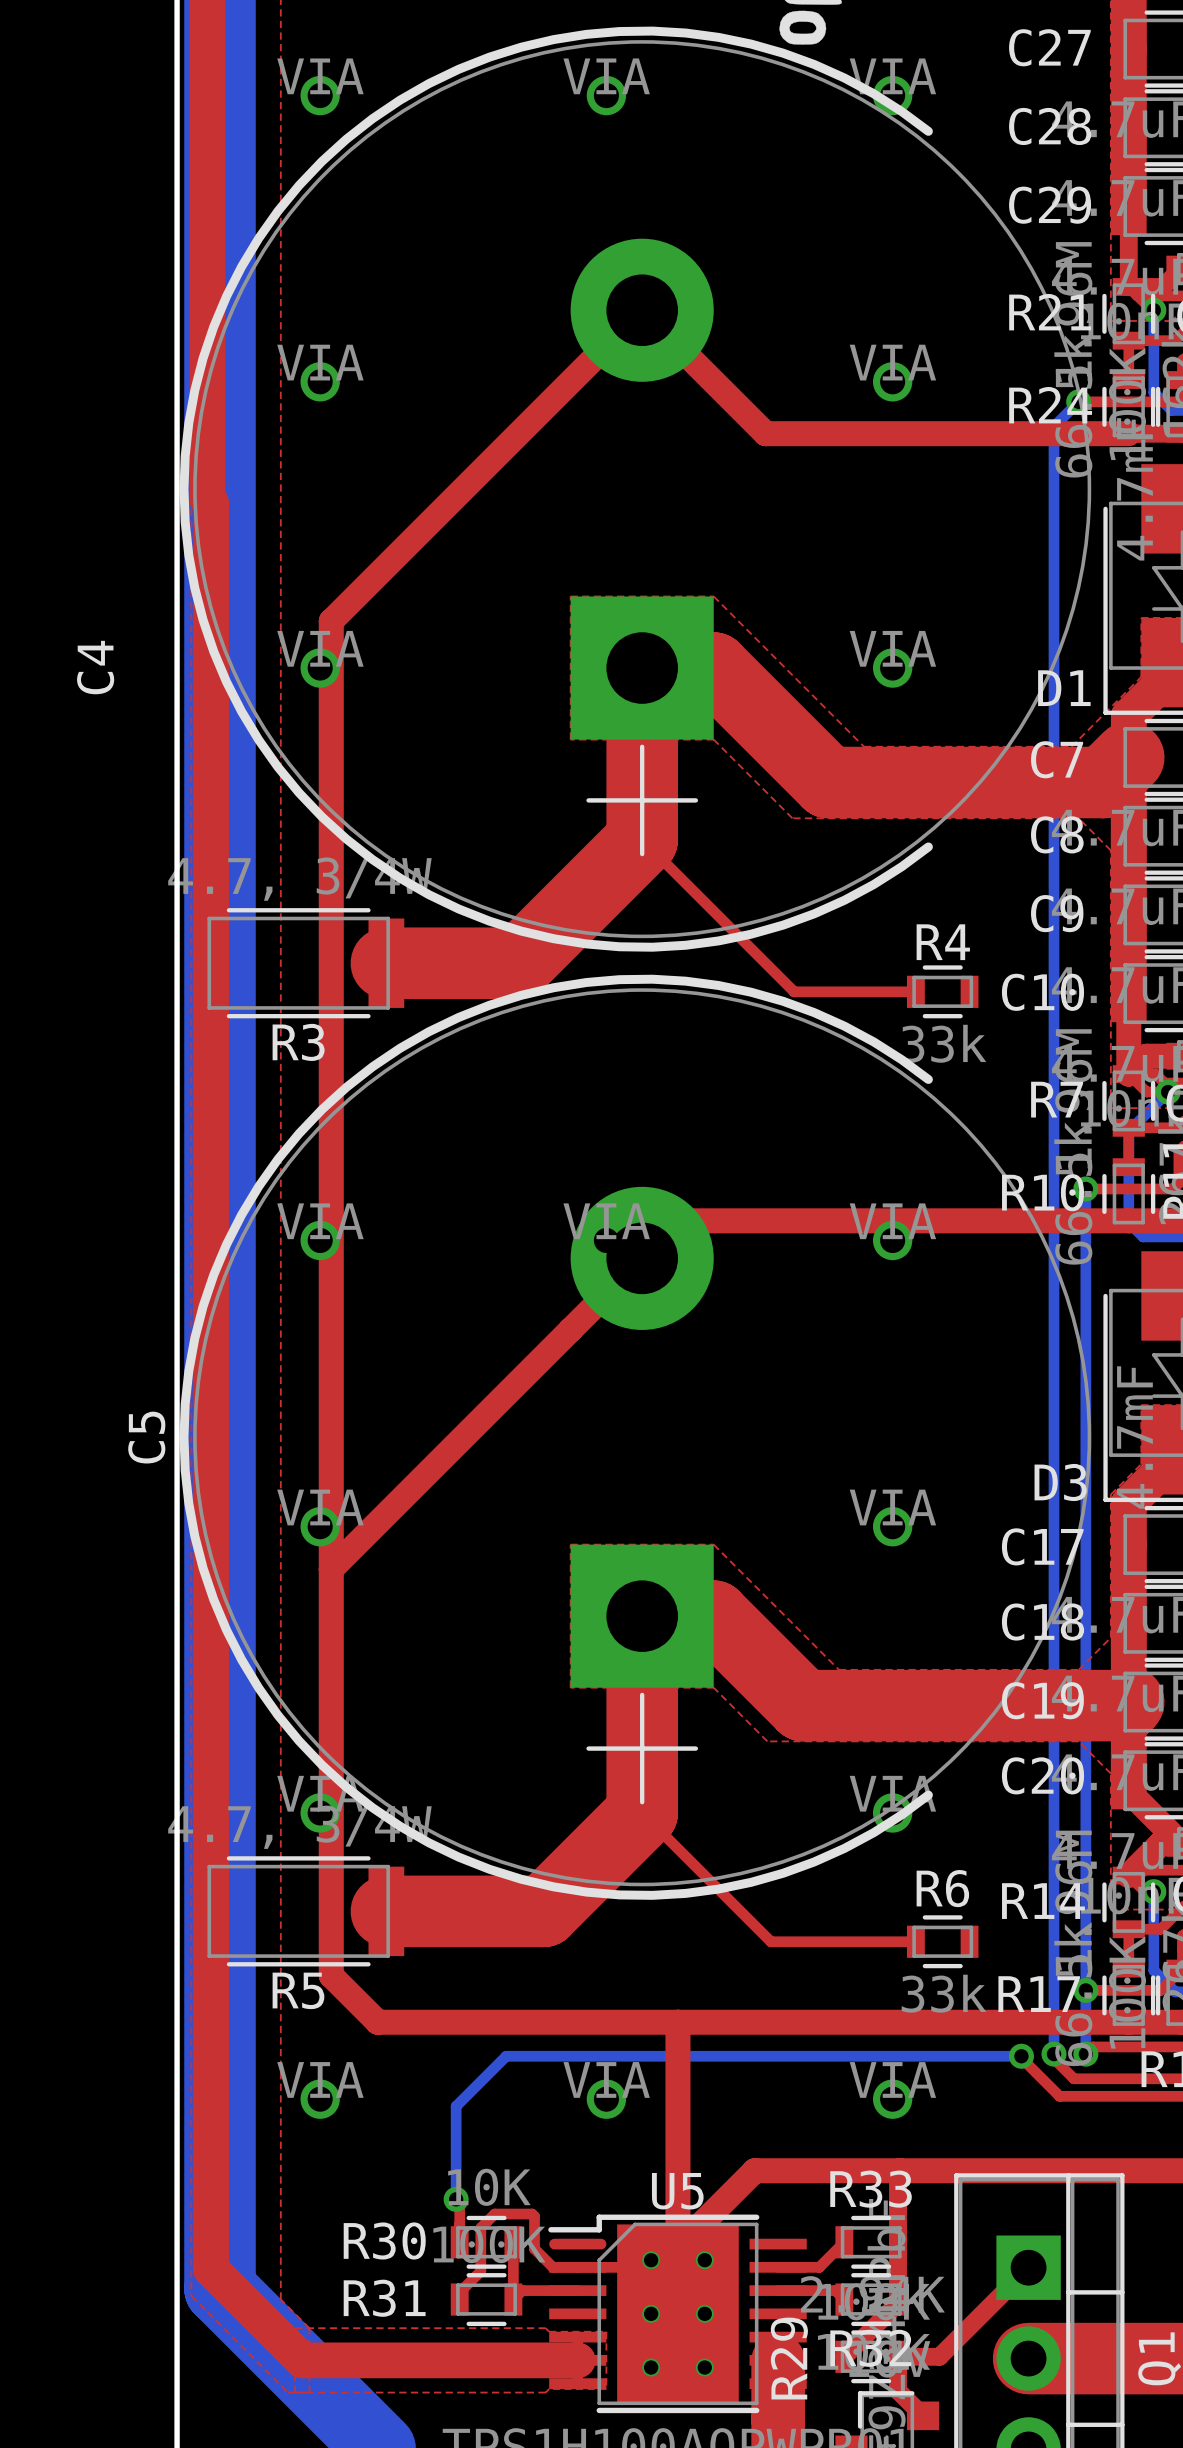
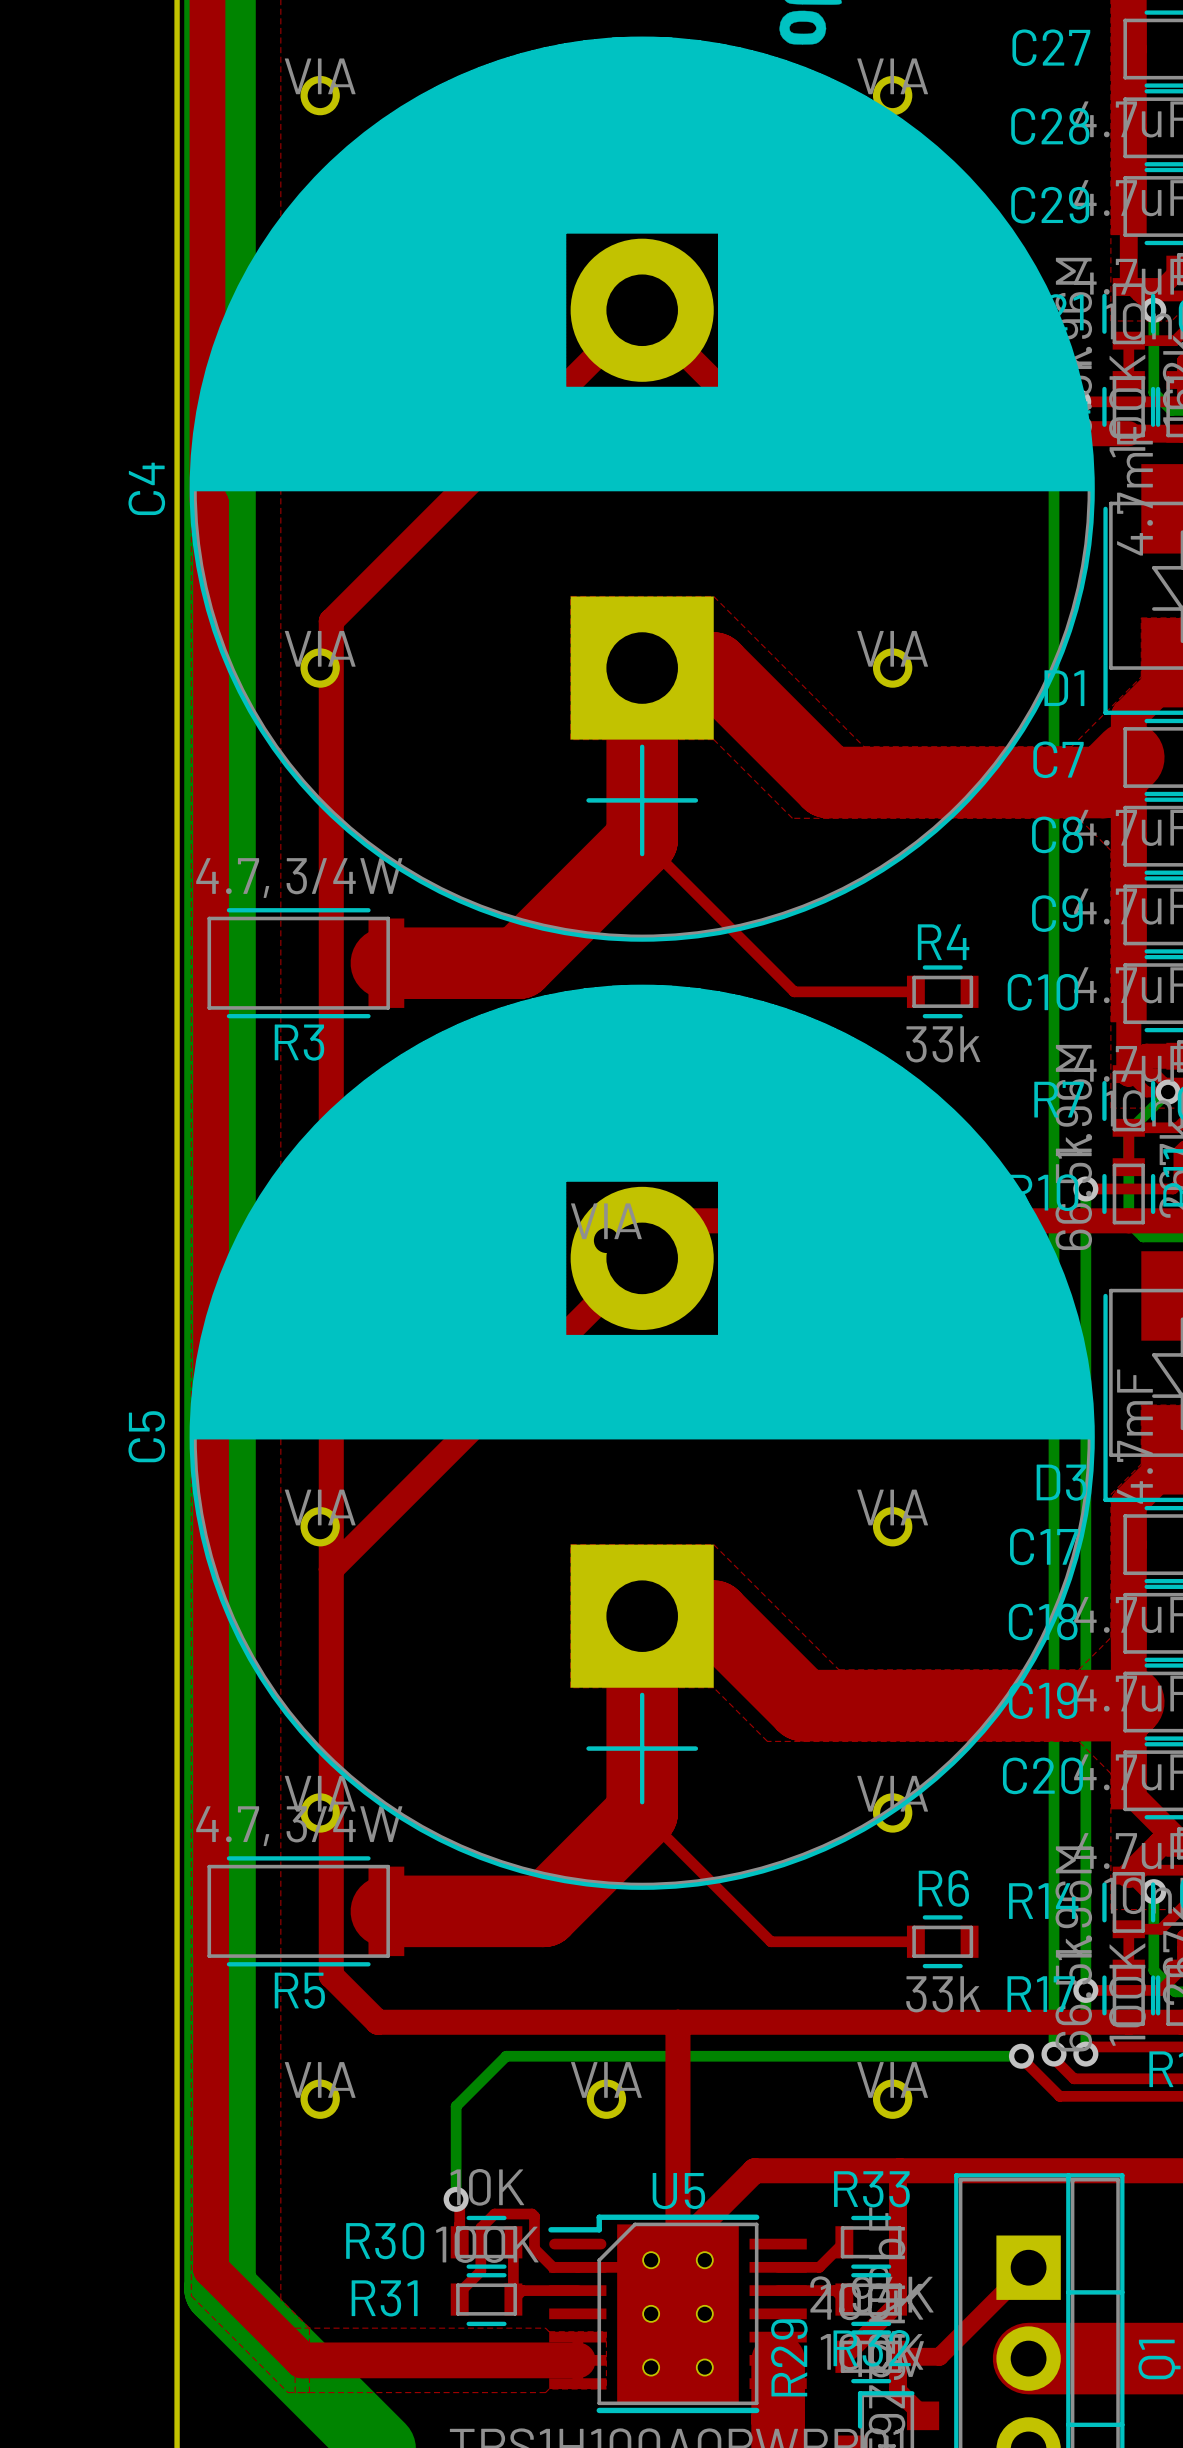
C4 footprint: [179, 26, 1092, 952] -> [189, 36, 1095, 942]
C4 name position: C4 (95, 667) -> C4 (146, 488)
C5 footprint: [179, 974, 1092, 1900] -> [189, 984, 1095, 1890]

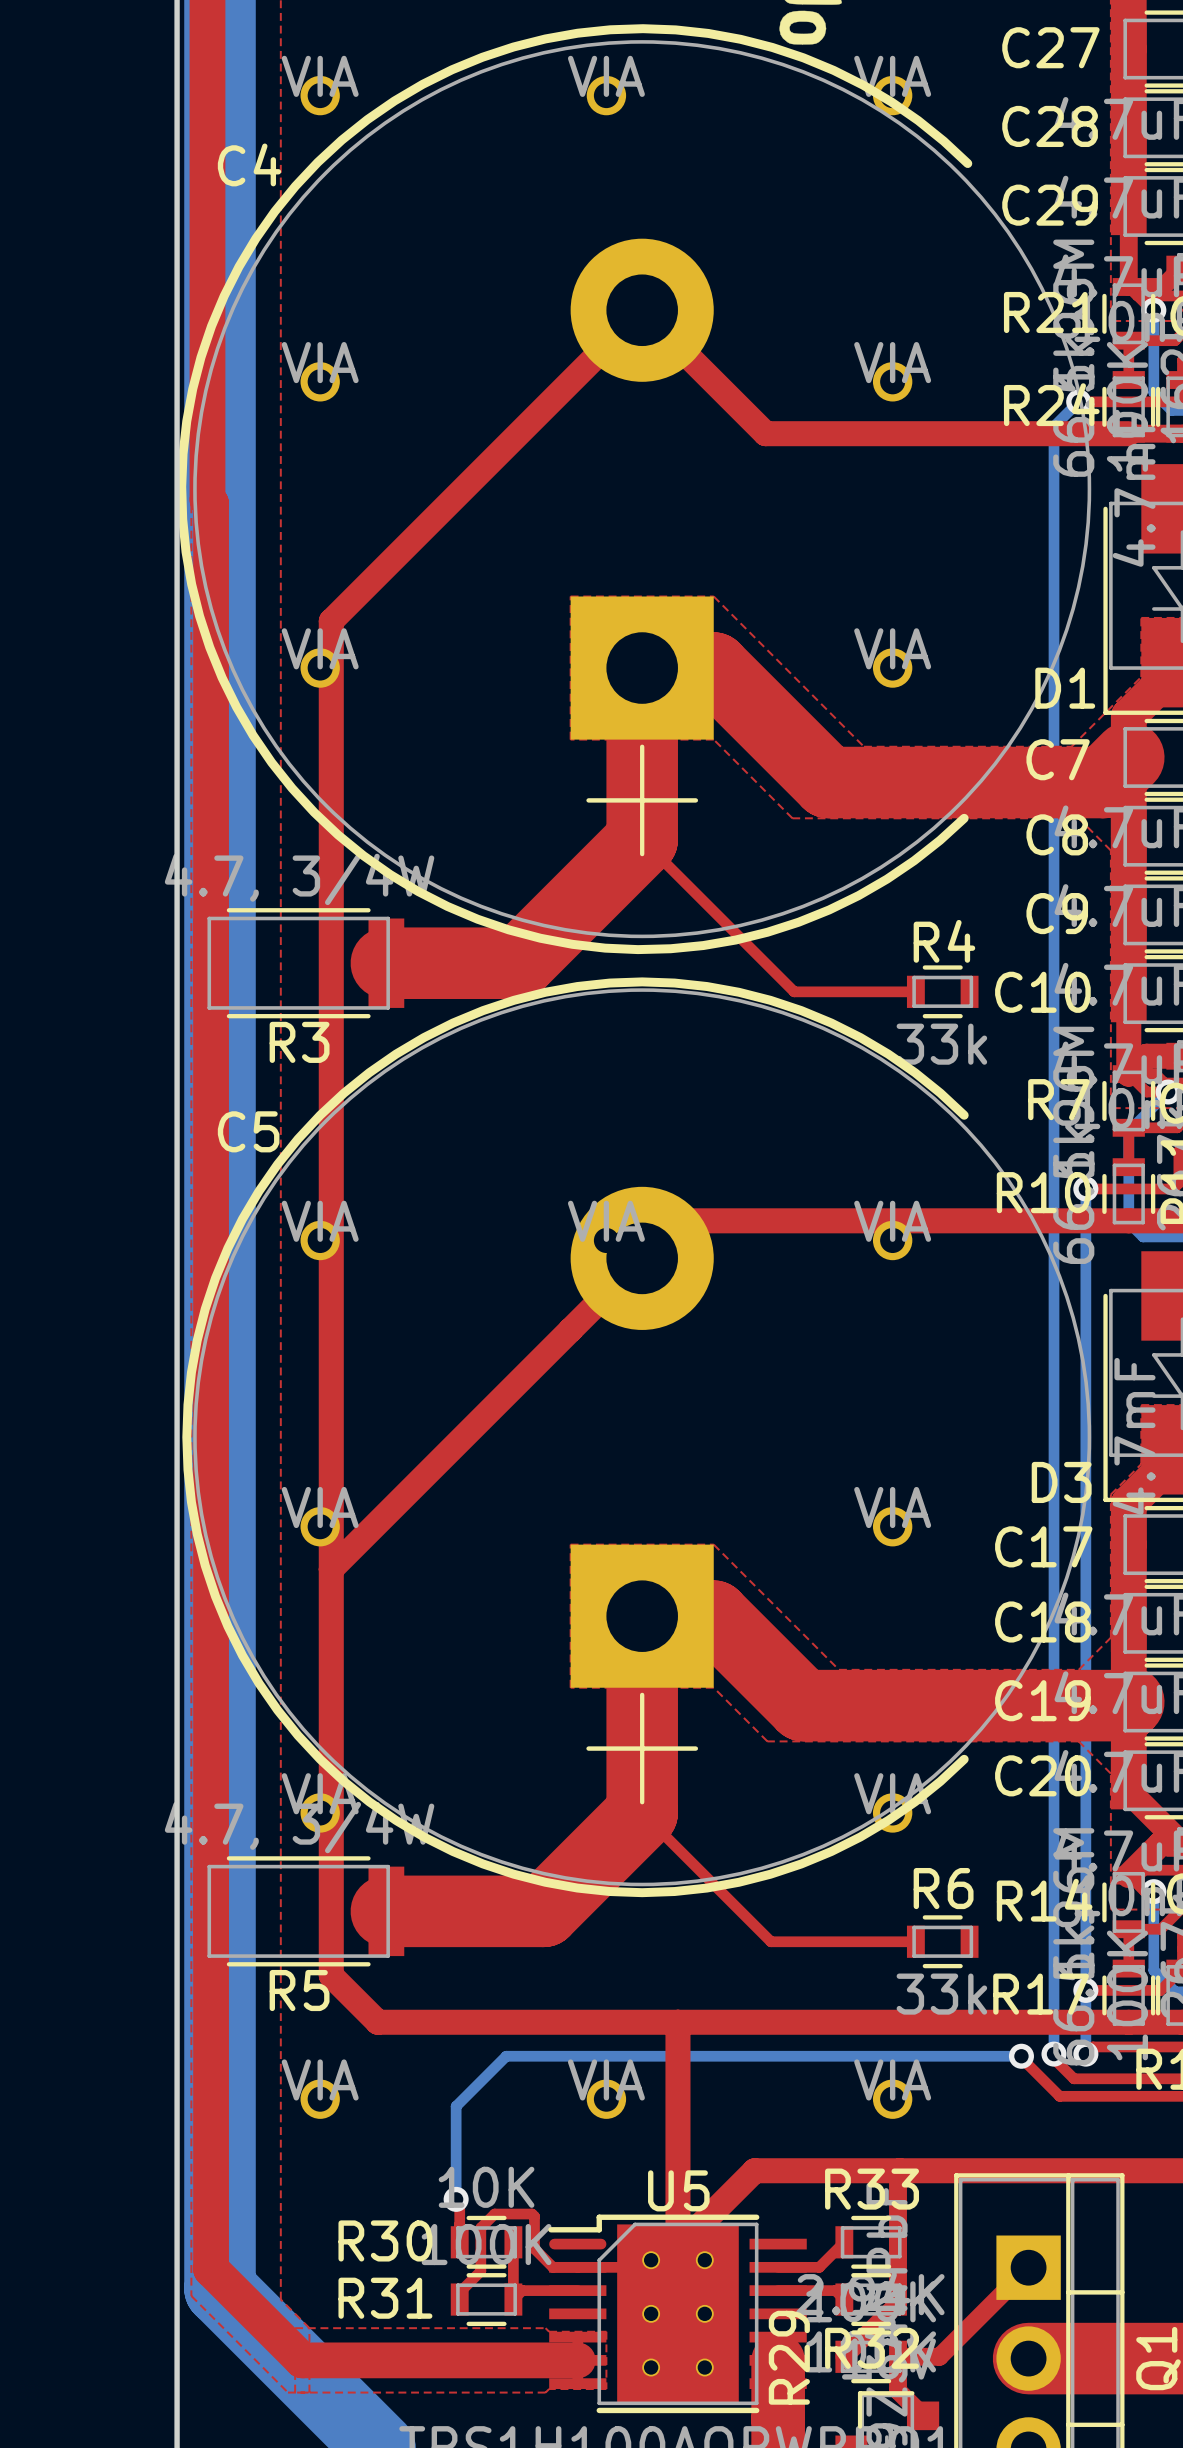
C4 footprint: [189, 36, 1095, 942] -> [177, 24, 1092, 955]
C4 name position: C4 (146, 488) -> C4 (249, 164)
C5 footprint: [189, 984, 1095, 1890] -> [182, 977, 1092, 1898]
C5 name position: C5 (146, 1436) -> C5 (248, 1131)

